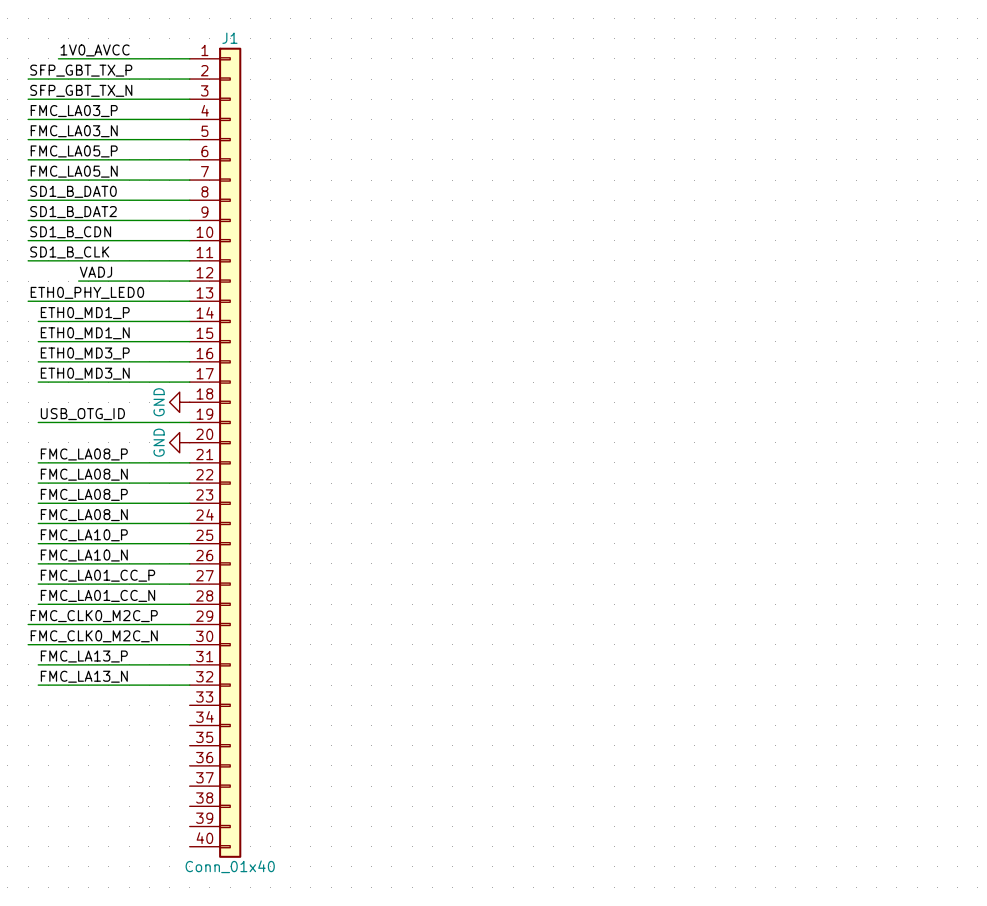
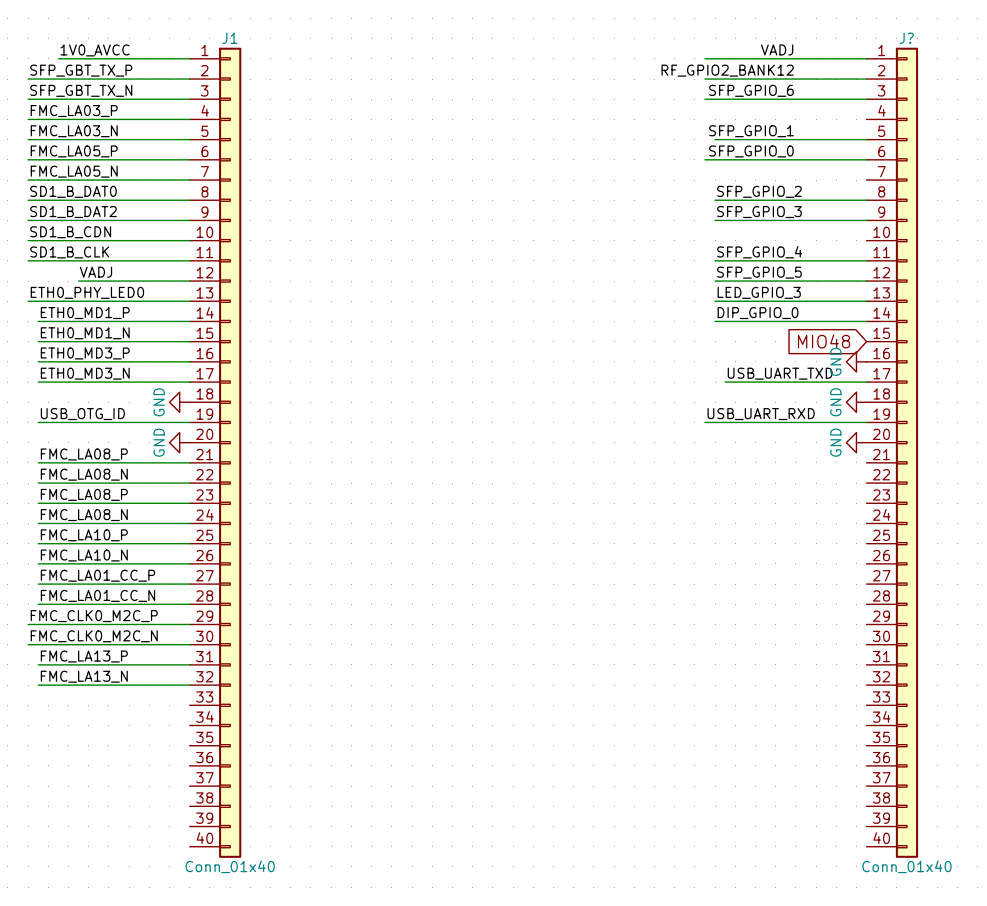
label: none -> VADJ (777, 49)
wire: none -> (704, 58) (866, 58)
label: none -> RF_GPIO2_BANK12 (727, 70)
wire: none -> (704, 79) (866, 79)
label: none -> SFP_GPIO_6 (751, 90)
wire: none -> (704, 99) (866, 99)
label: none -> SFP_GPIO_1 (751, 131)
wire: none -> (715, 139) (866, 139)
label: none -> SFP_GPIO_0 (751, 151)
wire: none -> (704, 159) (866, 159)
label: none -> SFP_GPIO_2 (759, 191)
wire: none -> (715, 200) (866, 200)
label: none -> SFP_GPIO_3 (759, 212)
wire: none -> (715, 220) (866, 220)
label: none -> SFP_GPIO_4 (759, 252)
wire: none -> (715, 260) (866, 260)
label: none -> SFP_GPIO_5 (759, 272)
wire: none -> (715, 281) (866, 281)
label: none -> LED_GPIO_3 (759, 292)
wire: none -> (715, 301) (866, 301)
label: none -> DIP_GPIO_0 (758, 313)
wire: none -> (715, 321) (866, 321)
global label: none -> MIO48 (824, 341)
power symbol: none -> GND (856, 361)
label: none -> USB_UART_TXD (780, 373)
wire: none -> (725, 382) (866, 382)
power symbol: none -> GND (856, 402)
label: none -> USB_UART_RXD (761, 414)
wire: none -> (704, 422) (866, 422)
power symbol: none -> GND (856, 442)
J?: none -> Conn_01x40 (892, 452)

